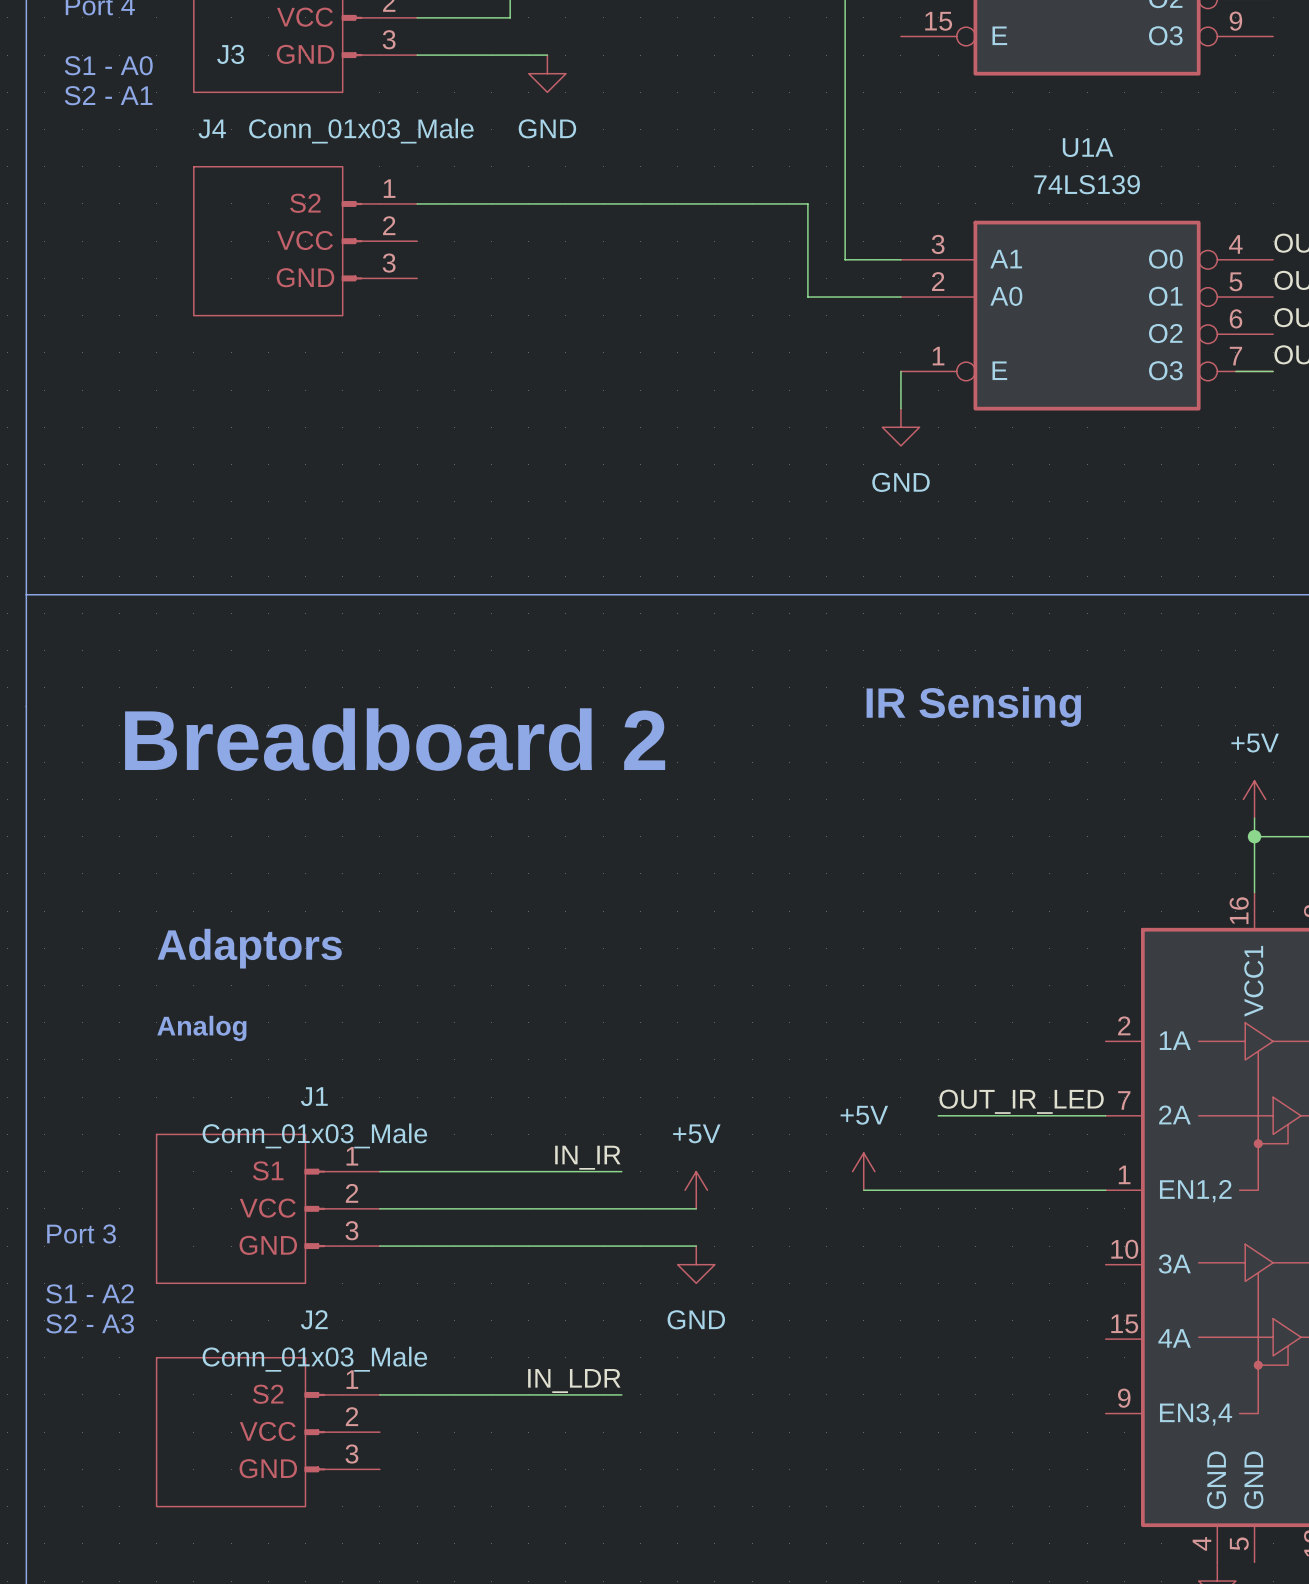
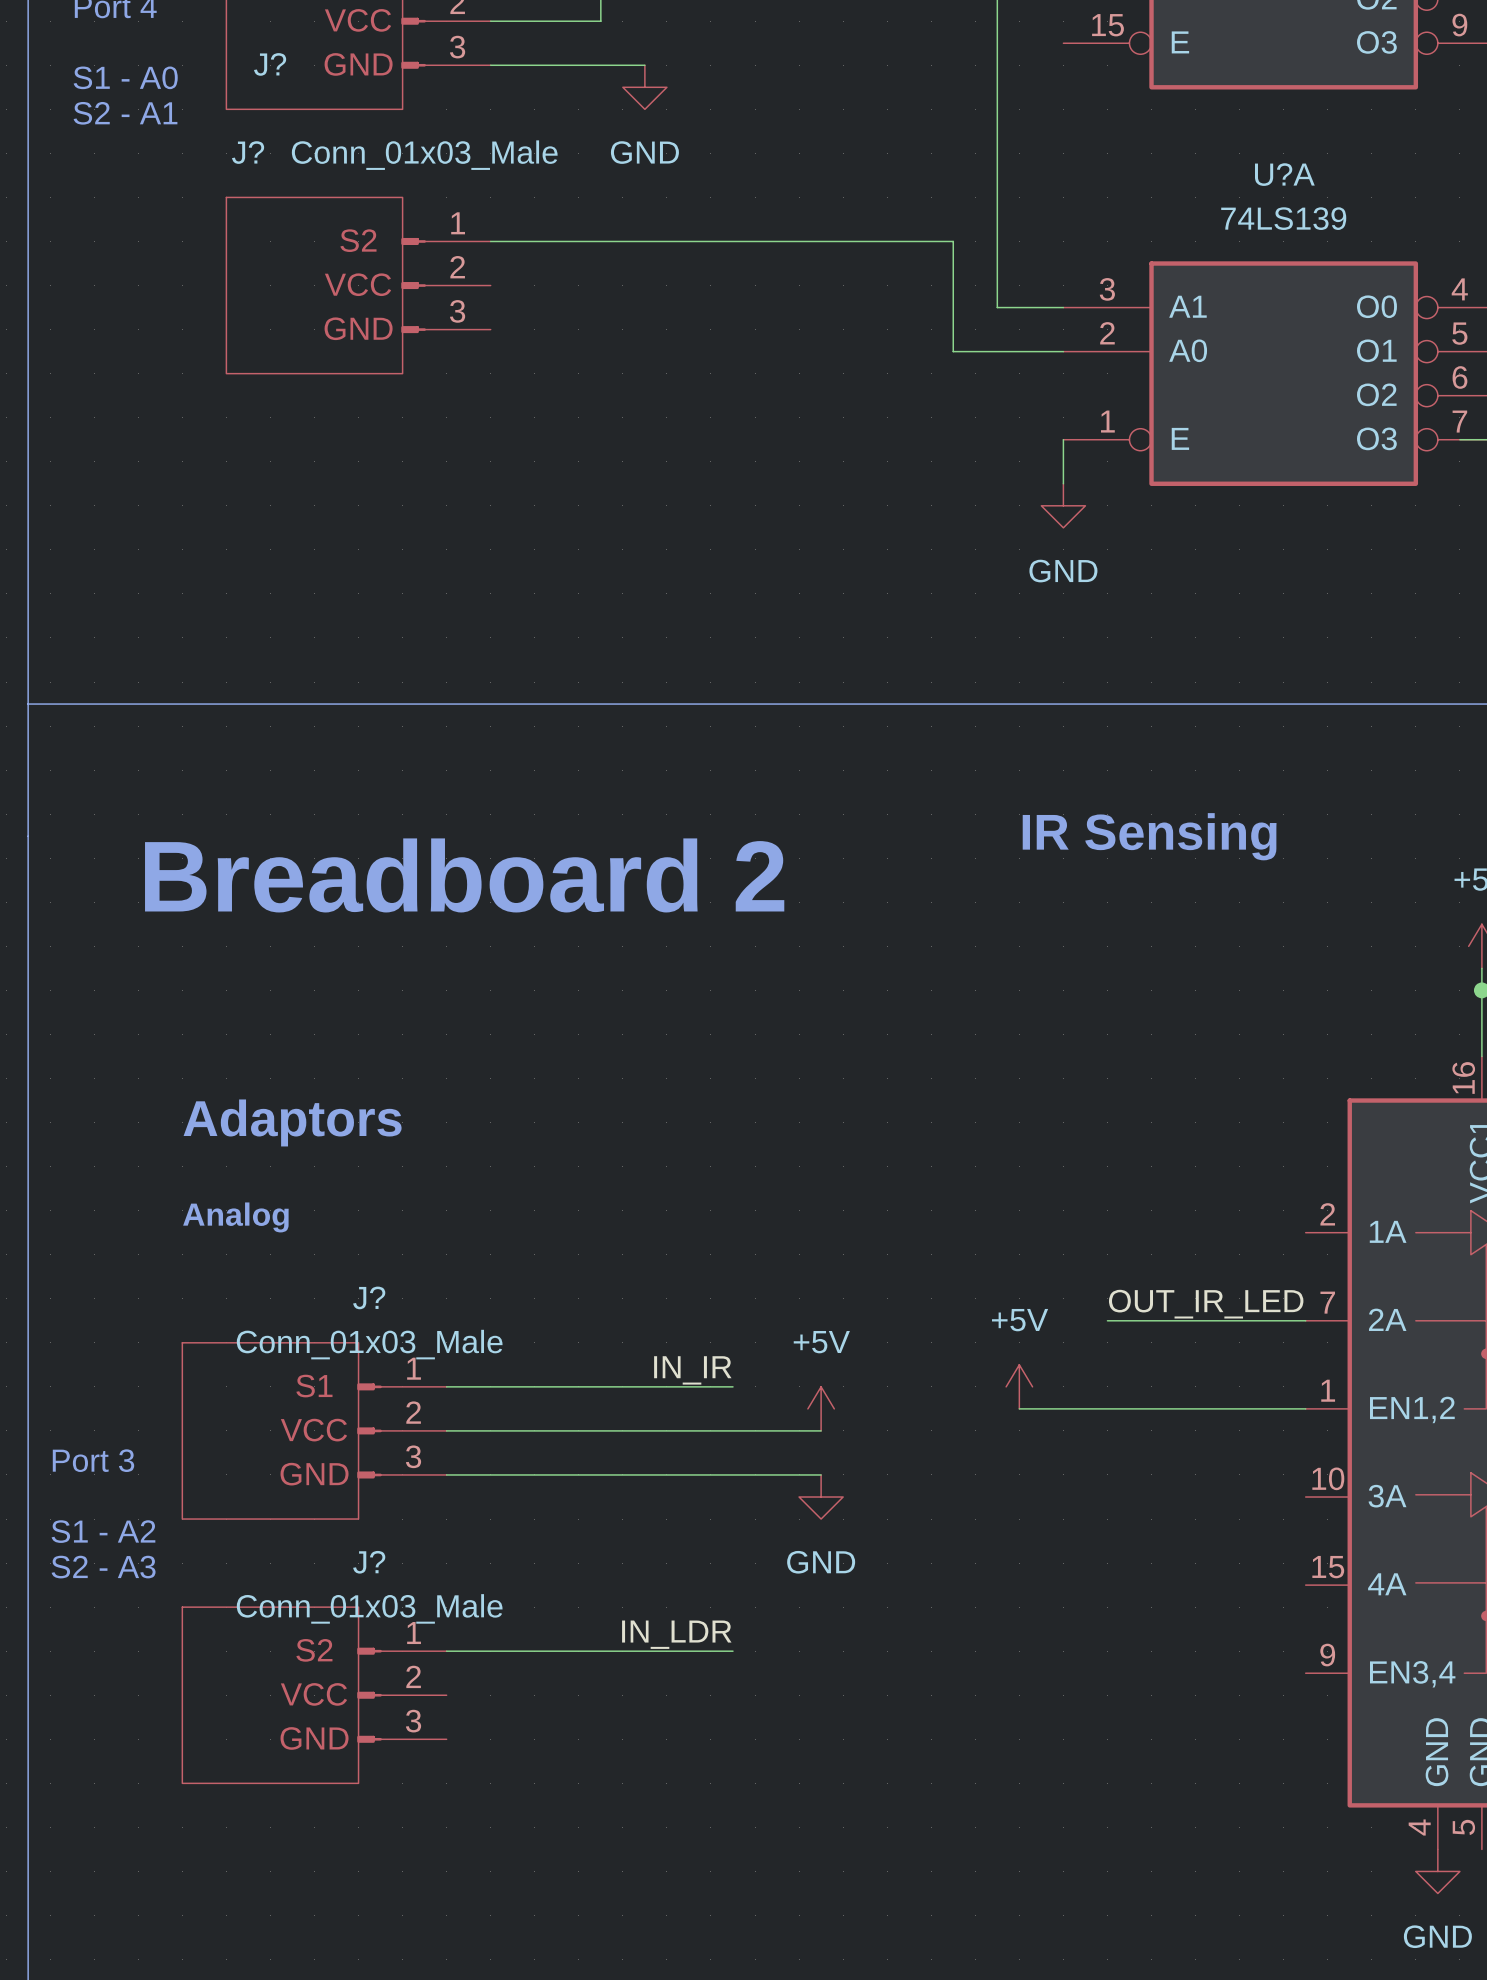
J3 name: J3 (230, 54) -> J? (270, 64)
J4 name: J4 (212, 128) -> J? (248, 152)
U1A name: U1A (1088, 147) -> U?A (1284, 174)
J1 name: J1 (314, 1096) -> J? (369, 1297)
J2 name: J2 (314, 1319) -> J? (369, 1562)

